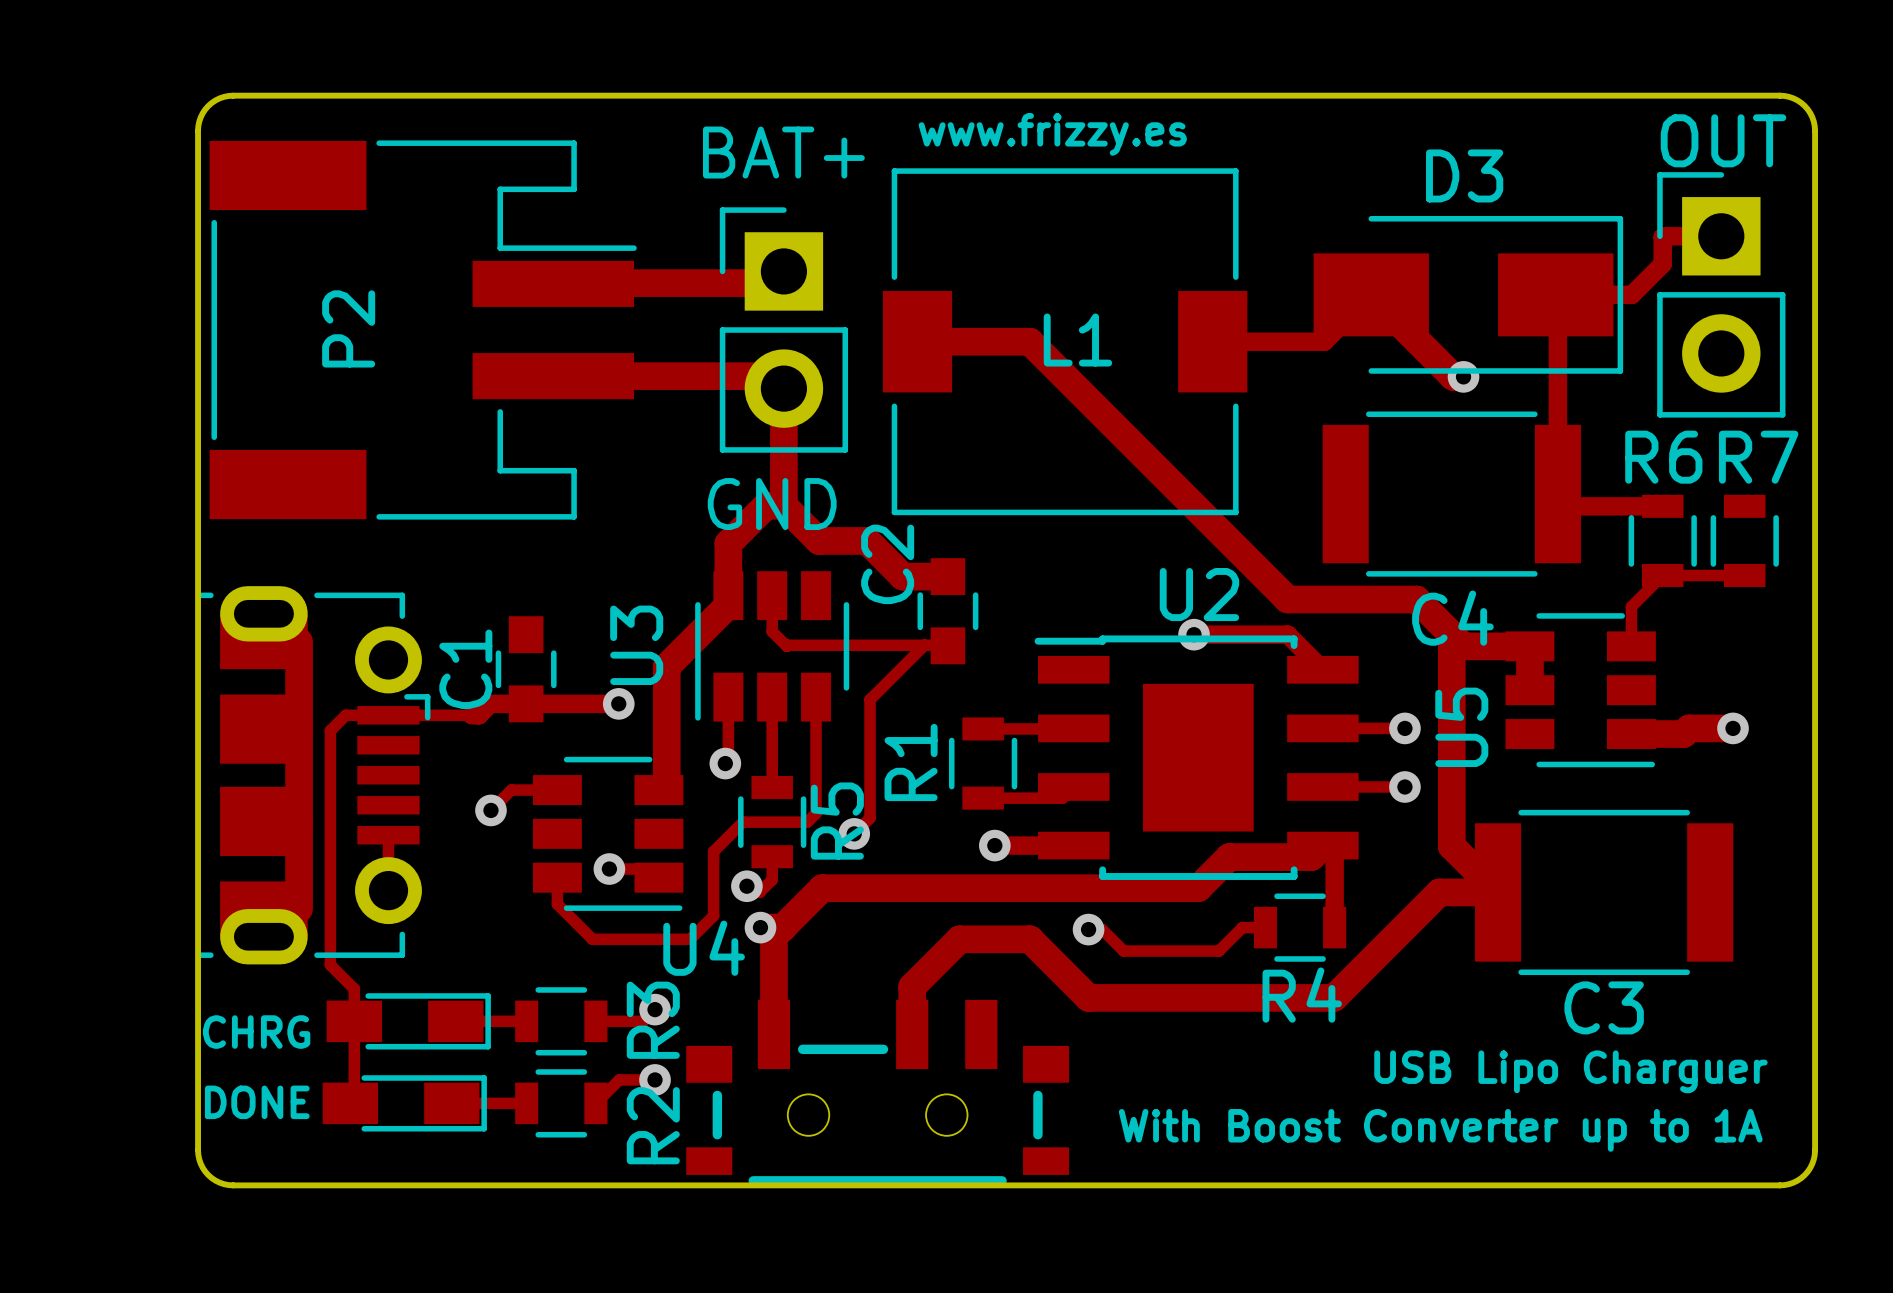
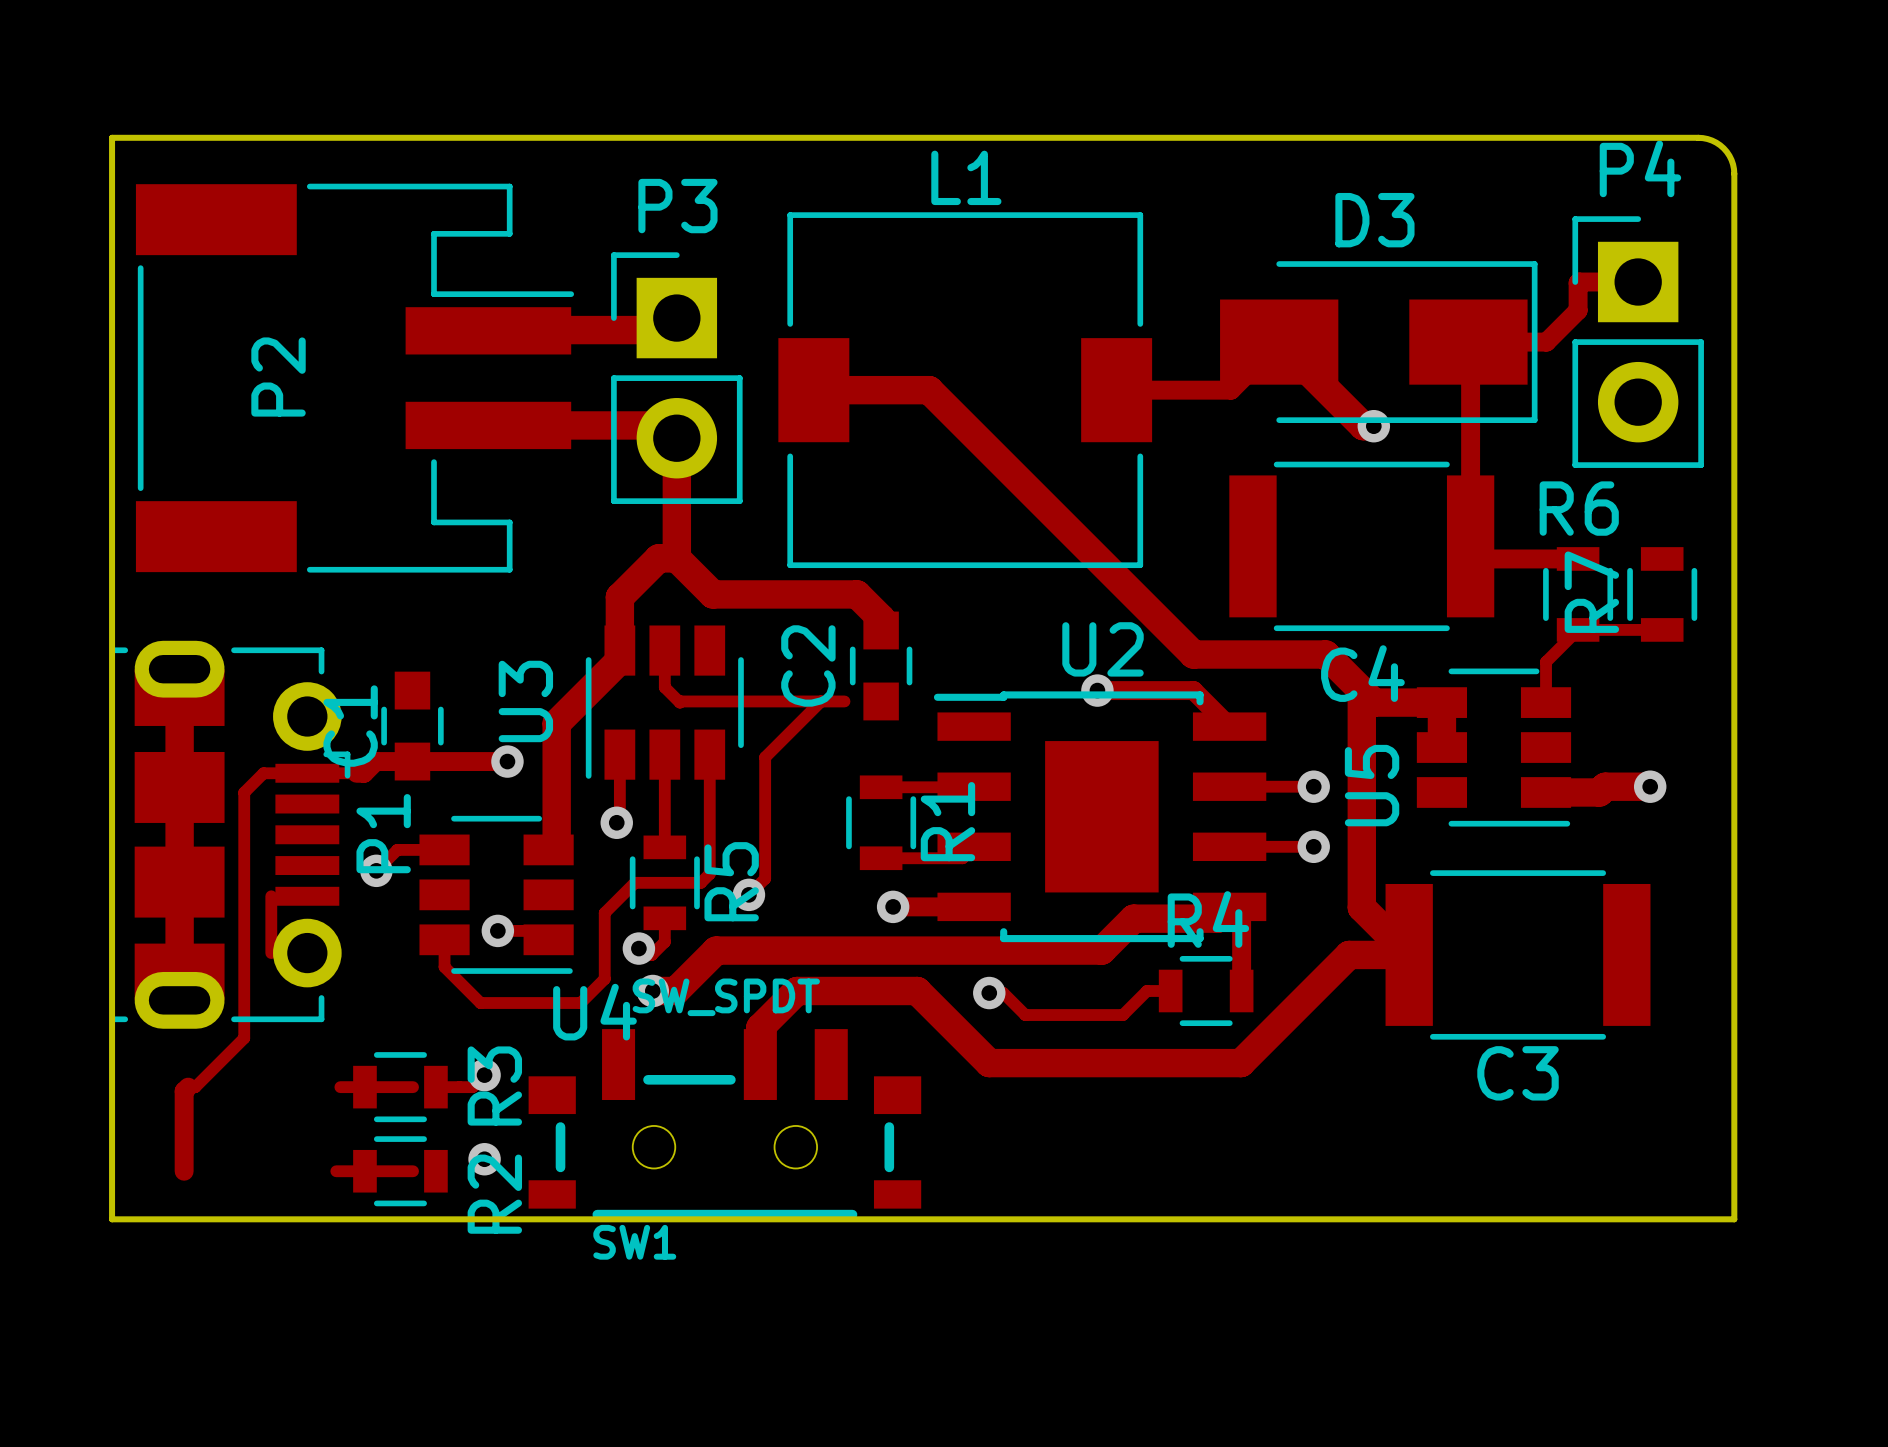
board edge: (233, 95) (219, 98) (208, 105) (200, 117) (198, 130) (198, 1150) (202, 1167) (215, 1180) (233, 1185) (1779, 1185) (1793, 1182) (1804, 1175) (1812, 1163) (1815, 1150) -> (112, 137) (112, 1219) (1734, 1219)
text: www.frizzy.es (1052, 134) -> none
OUT name: OUT (1723, 140) -> P4 (1640, 168)
text: BAT+ (783, 152) -> none
P3 name: none -> P3 (677, 206)
P2 position: (423, 330) -> (354, 378)
L1 name position: L1 (1077, 340) -> L1 (966, 177)
R7 name rotation: 0° (1758, 457) -> 90° counterclockwise (1591, 592)
text: GND (772, 504) -> none
track: (867, 540) (902, 576) (947, 576) -> (762, 594) (857, 594) (881, 618) (881, 630)
C2 name position: C2 (887, 564) -> C2 (808, 665)
C2 position: (947, 611) -> (881, 665)
track: (380, 715) (345, 715) (330, 730) (330, 965) (354, 989) (354, 1099) (350, 1103) -> (263, 773) (244, 792) (244, 1038) (195, 1087) (188, 1087) (184, 1091) (184, 1171)
R1 name position: R1 (911, 762) -> R1 (947, 821)
P1 name: none -> P1 (383, 833)
P1 position: (313, 775) -> (230, 834)
track: (782, 927) (773, 936) (773, 1034) -> none
track: (1029, 939) (959, 939) (912, 986) (912, 1034) -> (929, 1003) (917, 991) (797, 991) (760, 1027) (760, 1083)
R4 name position: R4 (1302, 995) -> R4 (1208, 919)
track: none -> (484, 1075) (472, 1087) (435, 1087)
via: none -> (484, 1075)
track: (655, 1009) (643, 1021) (595, 1021) -> none
via: (655, 1009) -> none
part: (408, 1021) -> none
R3 position: (561, 1021) -> (400, 1087)
text: CHRG (256, 1032) -> none
SW1: none -> SW_SPDT (724, 1124)
text: USB Lipo Charguer (1570, 1071) -> none
track: (655, 1079) (619, 1079) (595, 1103) -> none
via: (655, 1079) -> none
via: none -> (484, 1159)
part: (877, 1092) -> none
text: DONE (257, 1102) -> none
part: (404, 1103) -> none
R2 position: (561, 1103) -> (400, 1171)
text: With Boost Converter up to 1A (1440, 1130) -> none

